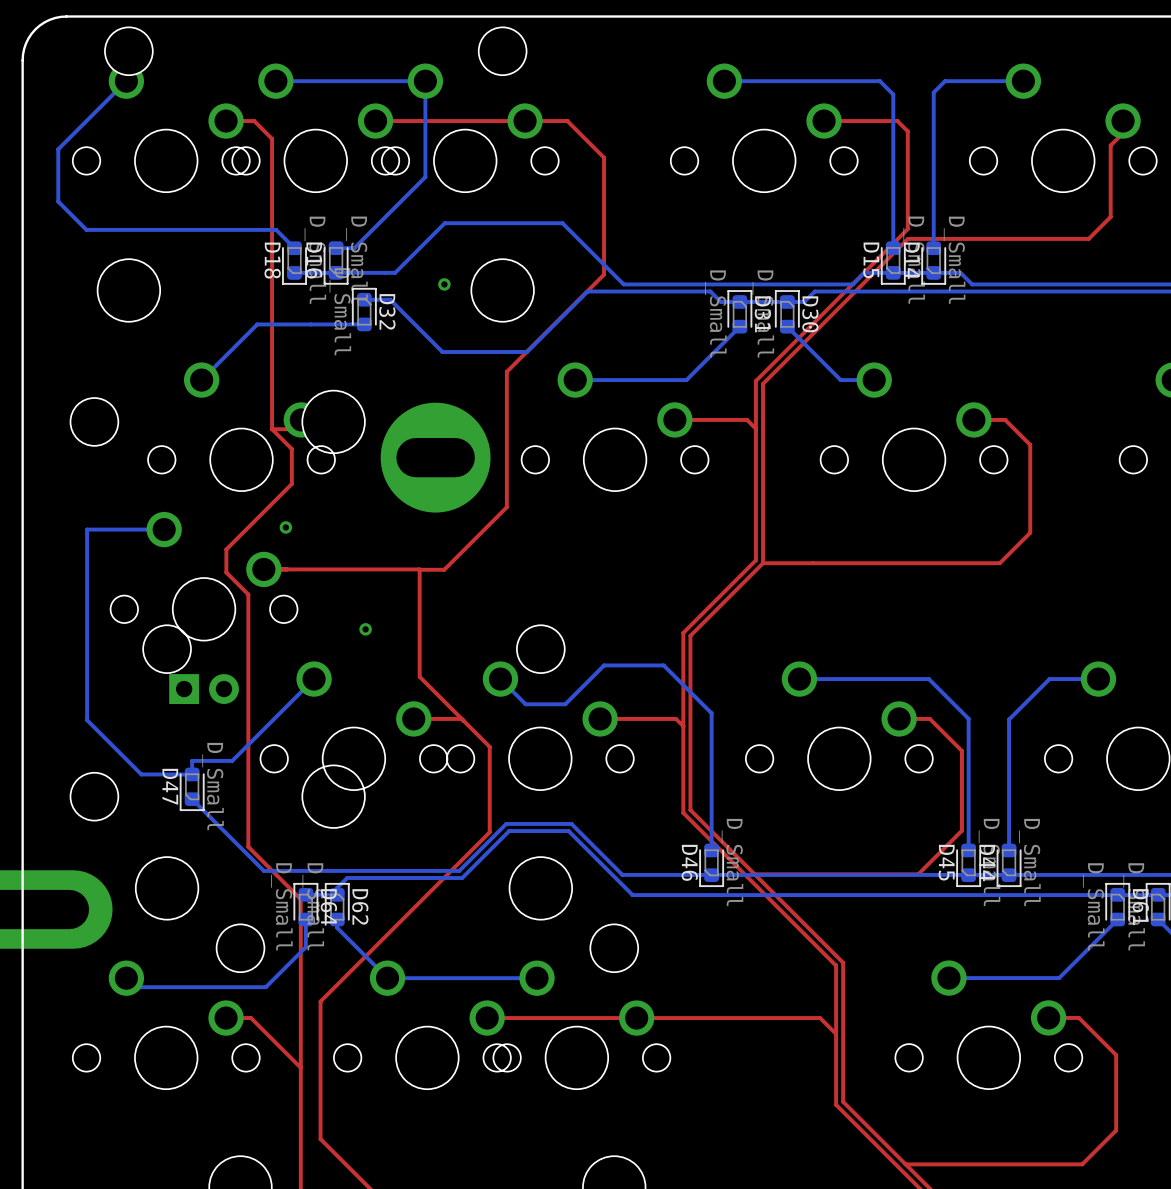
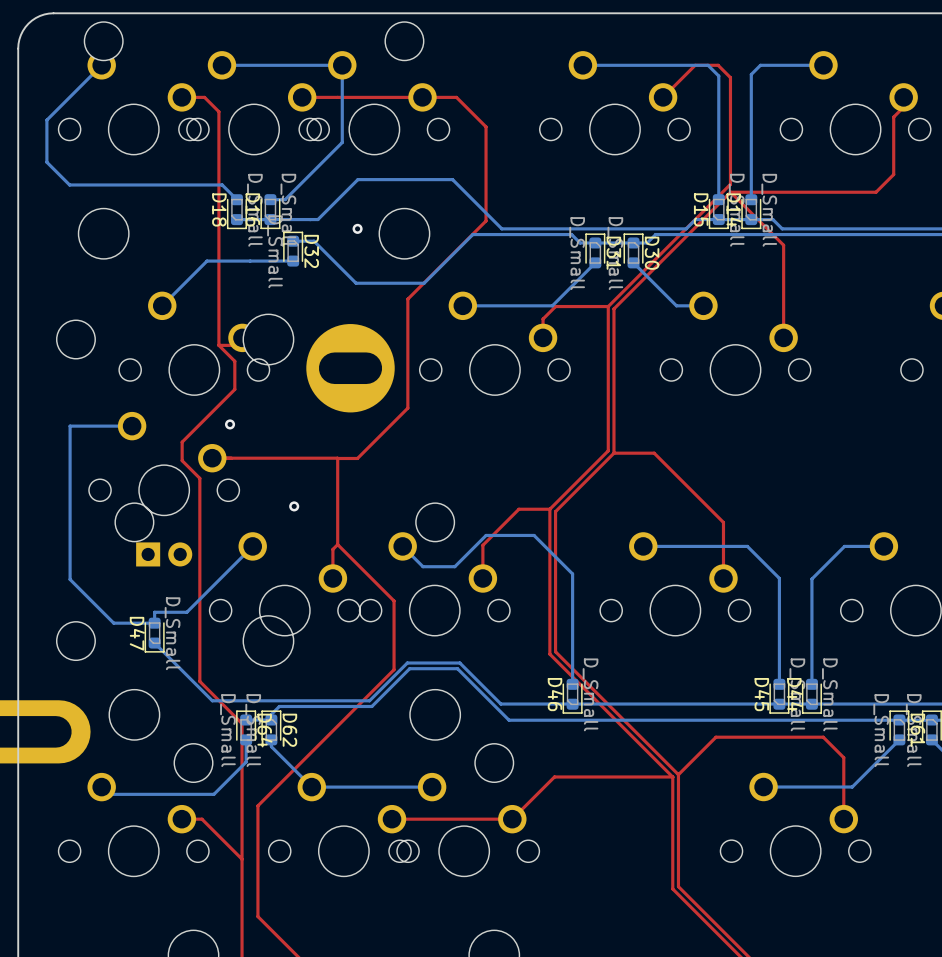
top track: (824, 121) (897, 121) (907, 131) -> (663, 97) (695, 65) (718, 65) (730, 77) (730, 105)
top track: none -> (730, 192) (783, 245) (783, 337)
top track: (674, 419) (747, 419) (755, 428) -> (543, 337) (543, 319) (555, 306) (608, 306)
top track: (973, 419) (1005, 419) (1030, 444) (1030, 532) (999, 563) (813, 563) -> (723, 578) (723, 522) (654, 453)
top track: (461, 718) (413, 718) -> (337, 544) (332, 549) (332, 578)
top track: (600, 718) (676, 718) (683, 726) -> (482, 578) (482, 545) (518, 509) (549, 509)
top track: (899, 718) (929, 718) (961, 750) (961, 830) (918, 874) (754, 874) -> none
top track: (1048, 1017) (1079, 1017) (1116, 1055) (1116, 1130) (1082, 1164) (905, 1164) -> (843, 819) (843, 757) (823, 737) (715, 737) (678, 774)
top track: (636, 1018) (820, 1018) (836, 1033) -> (512, 819) (554, 776) (672, 776)

